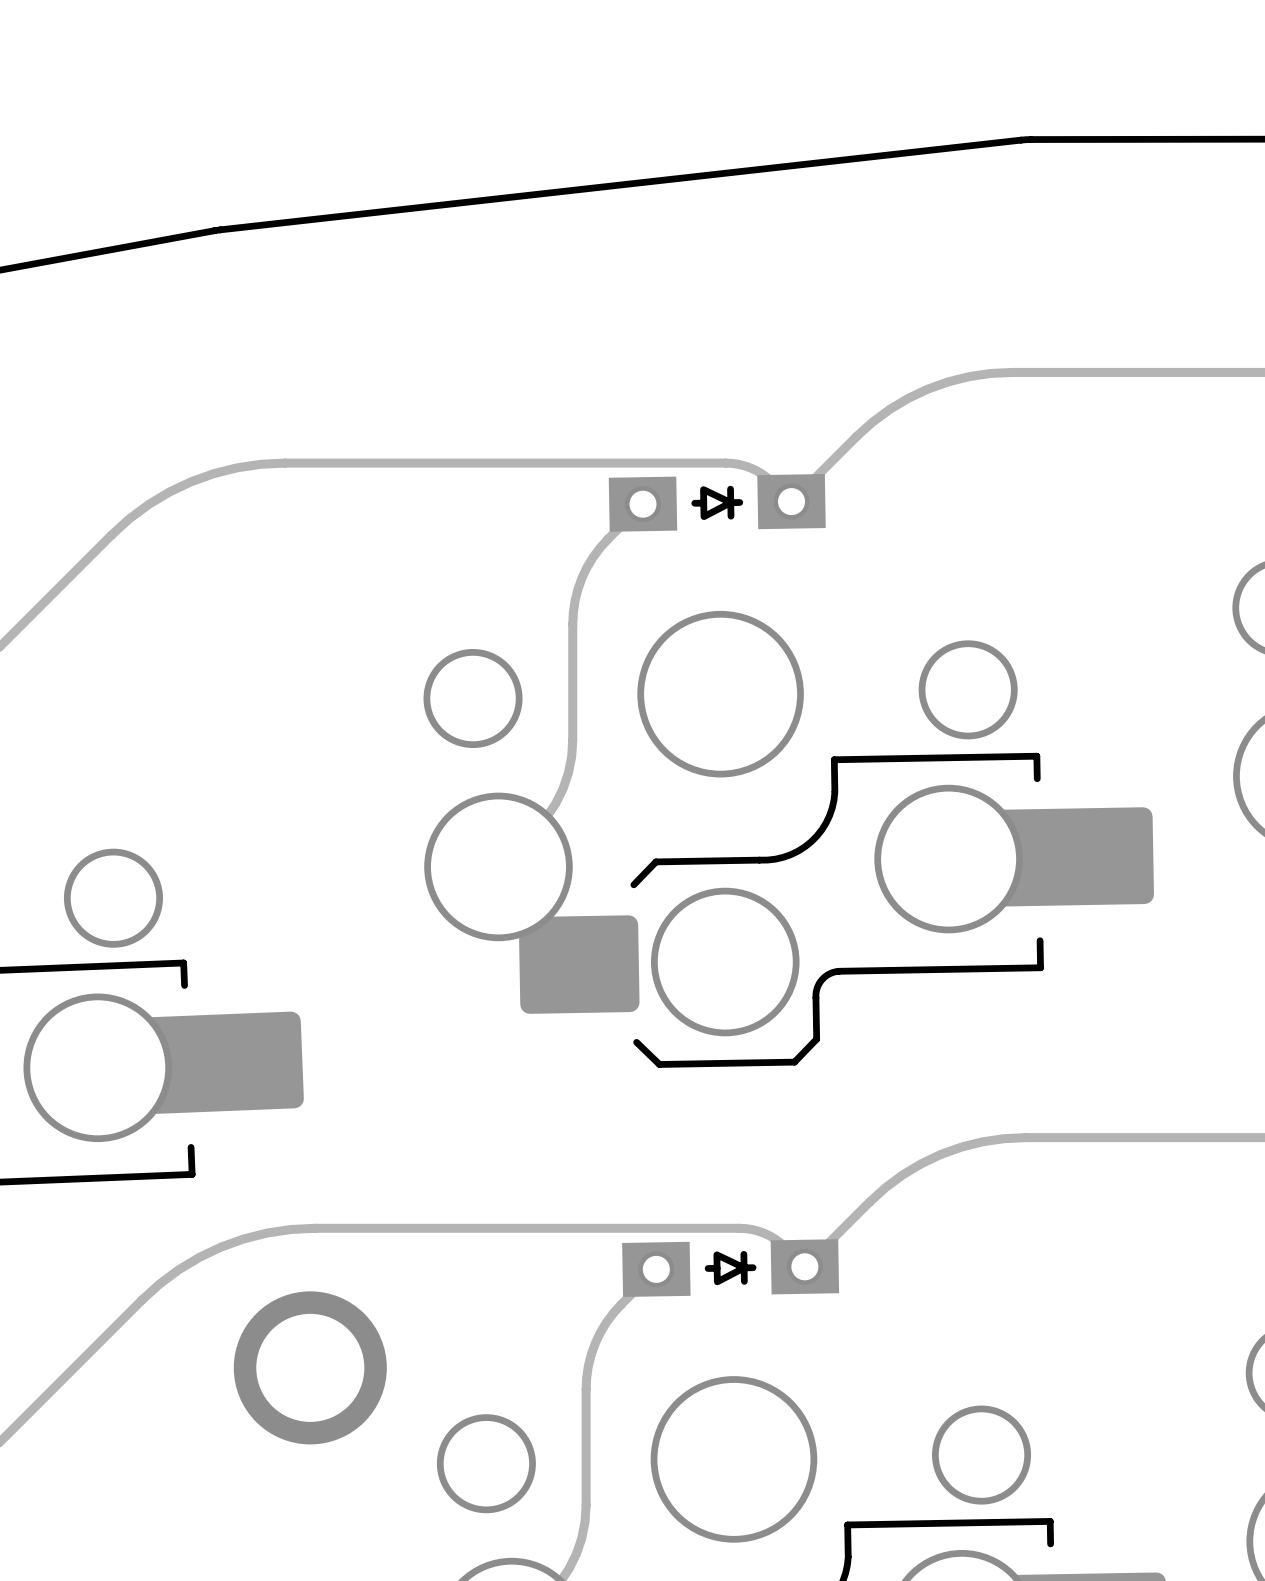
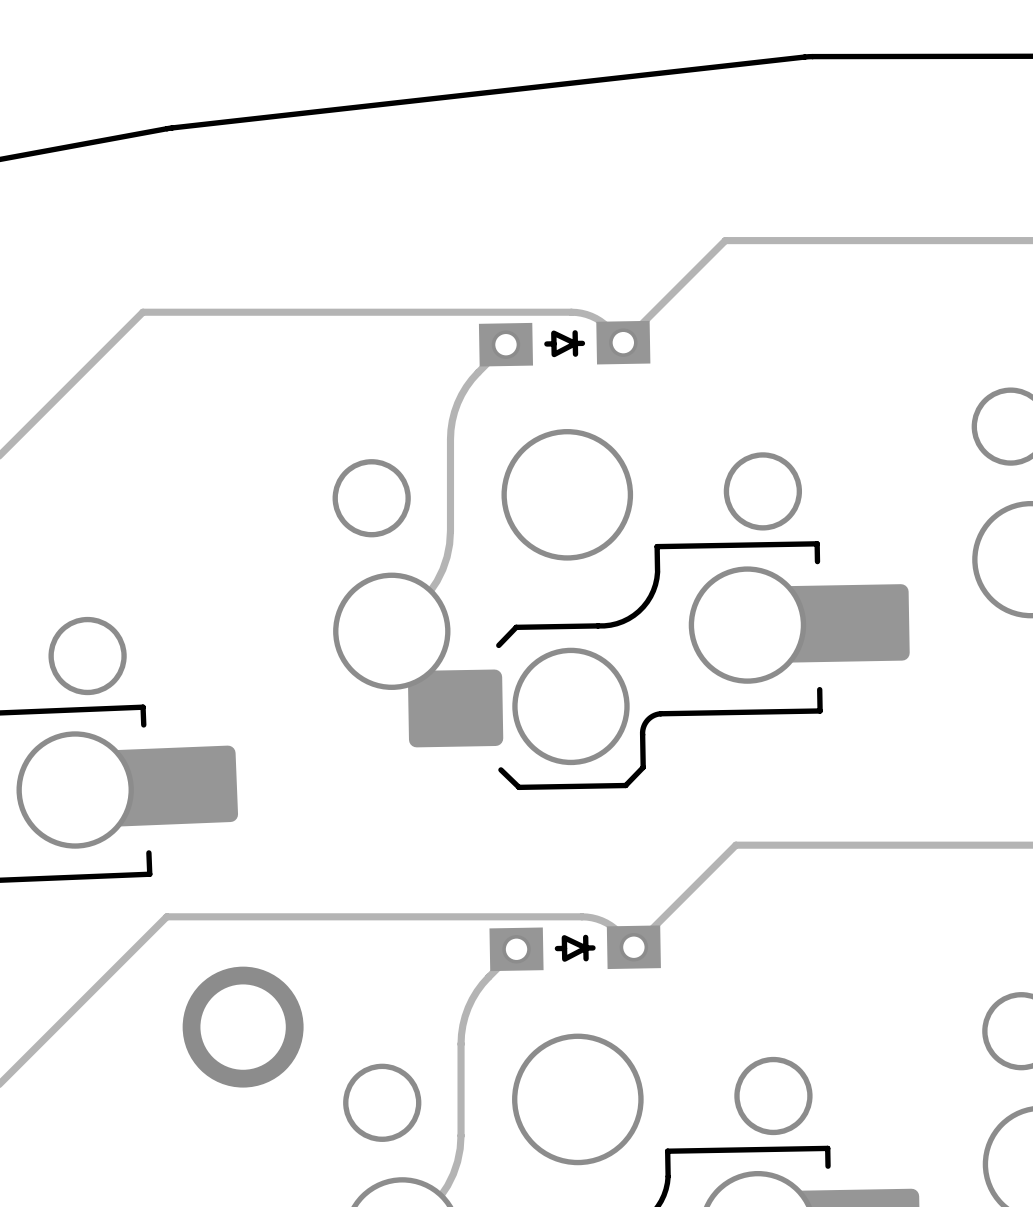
track: (1012, 372) (969, 376) (927, 389) (889, 409) (856, 437) -> (797, 240) (725, 240) (674, 291)
track: (284, 463) (237, 467) (191, 481) (148, 504) (111, 534) -> (223, 312) (142, 312) (86, 368)
track: (1025, 1137) (982, 1141) (941, 1154) (902, 1174) (869, 1202) -> (808, 845) (735, 845) (684, 896)
track: (315, 1228) (267, 1233) (221, 1246) (179, 1269) (141, 1300) -> (246, 916) (166, 916) (110, 973)

